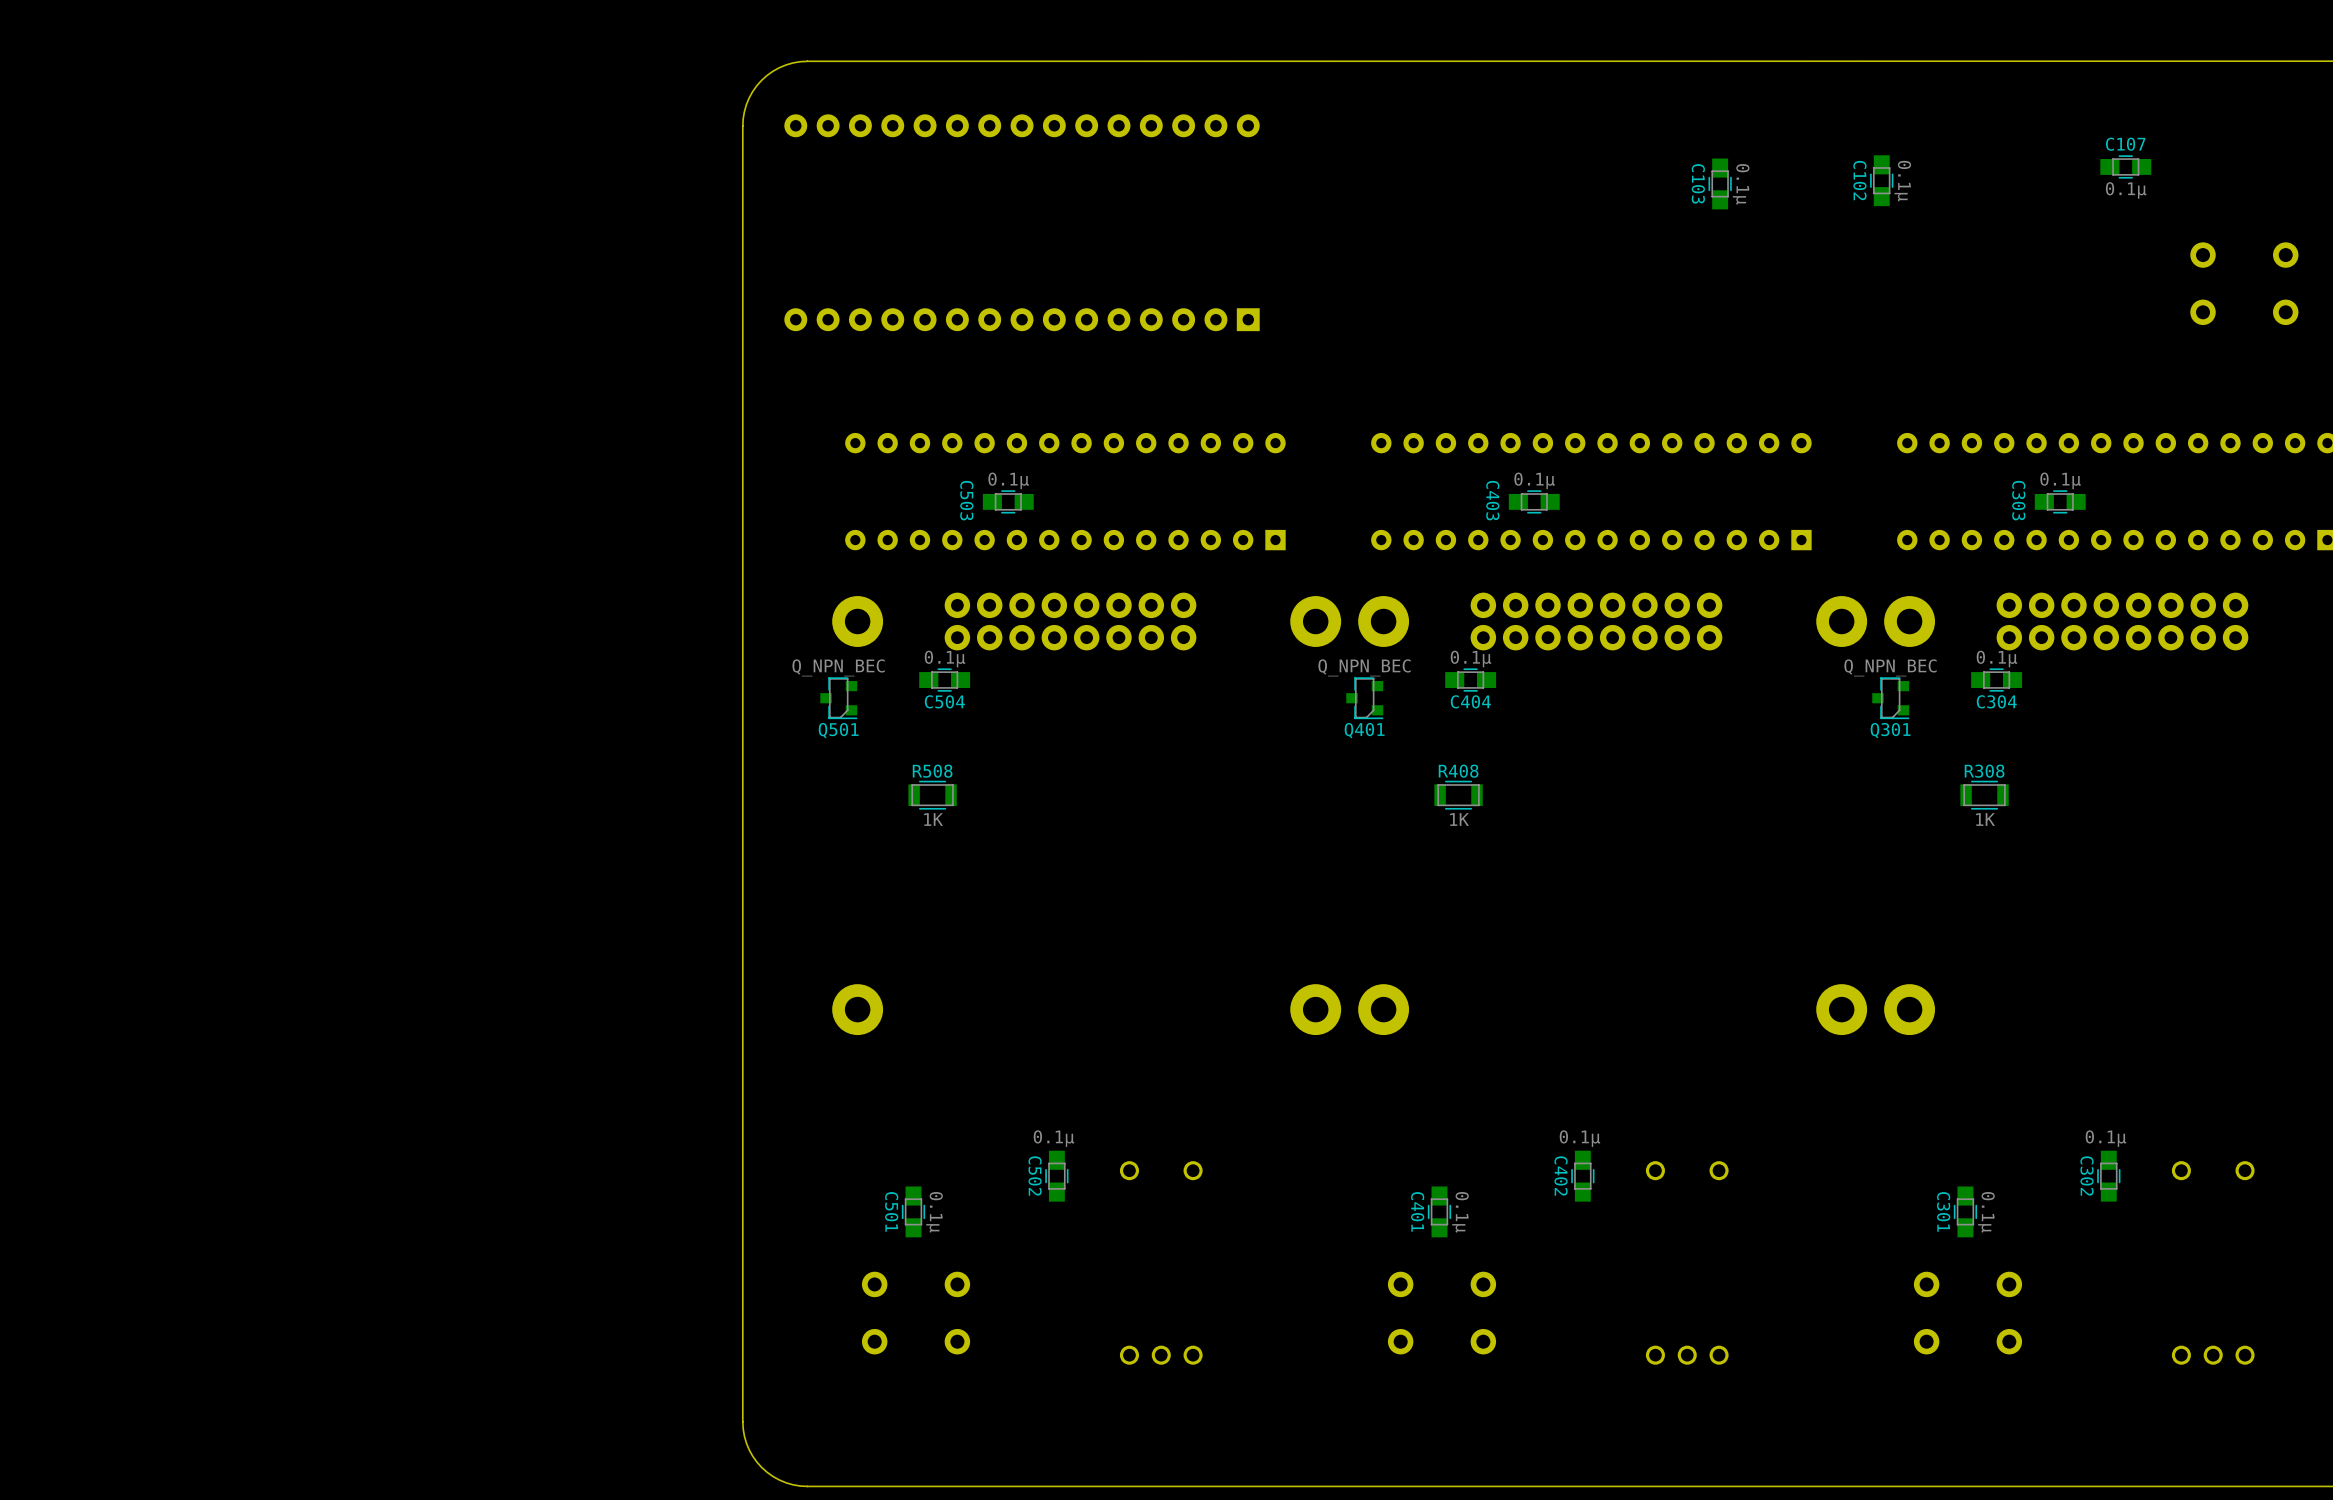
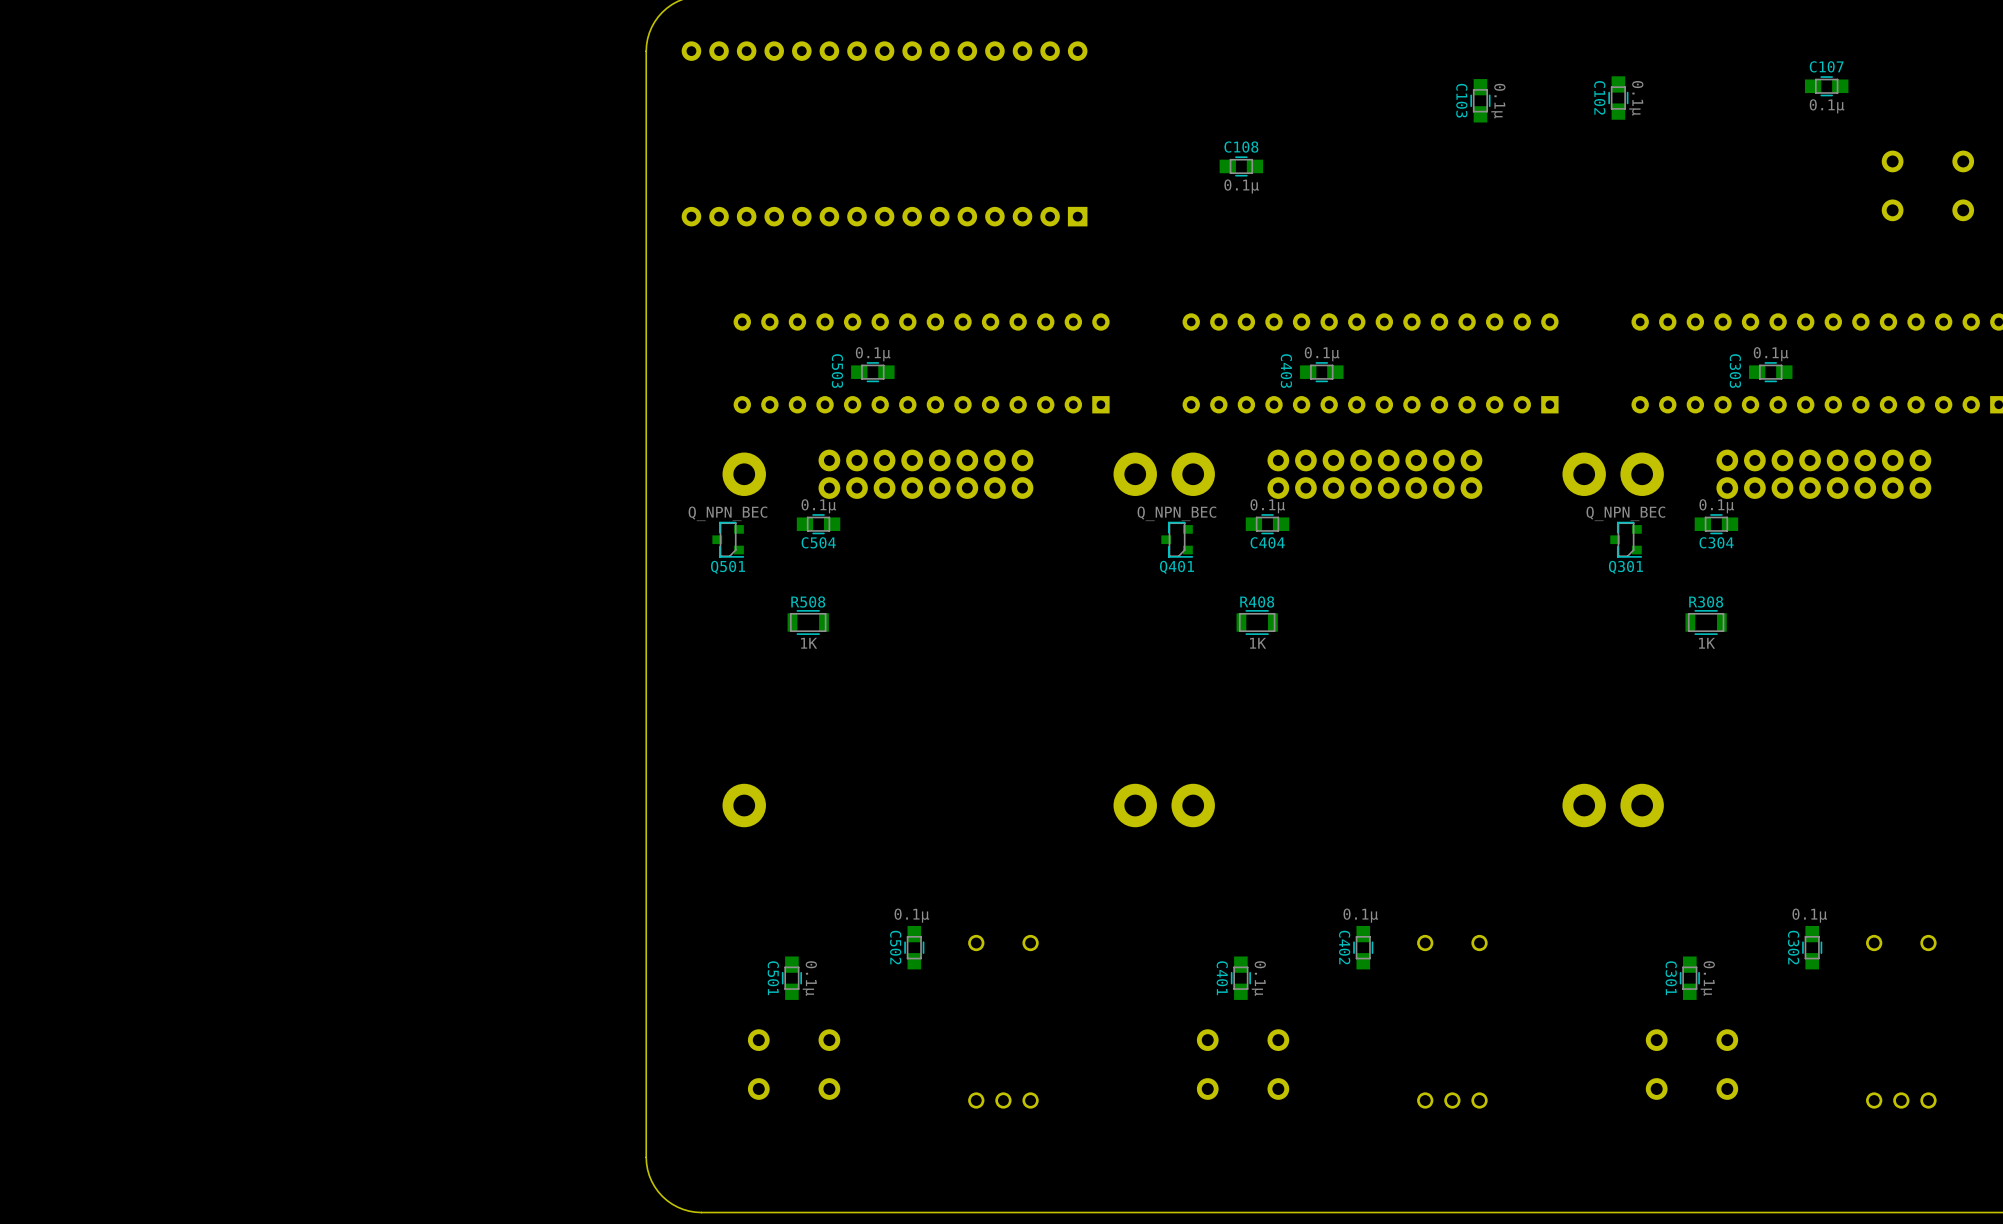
C108: none -> 0.1µ (1241, 166)

